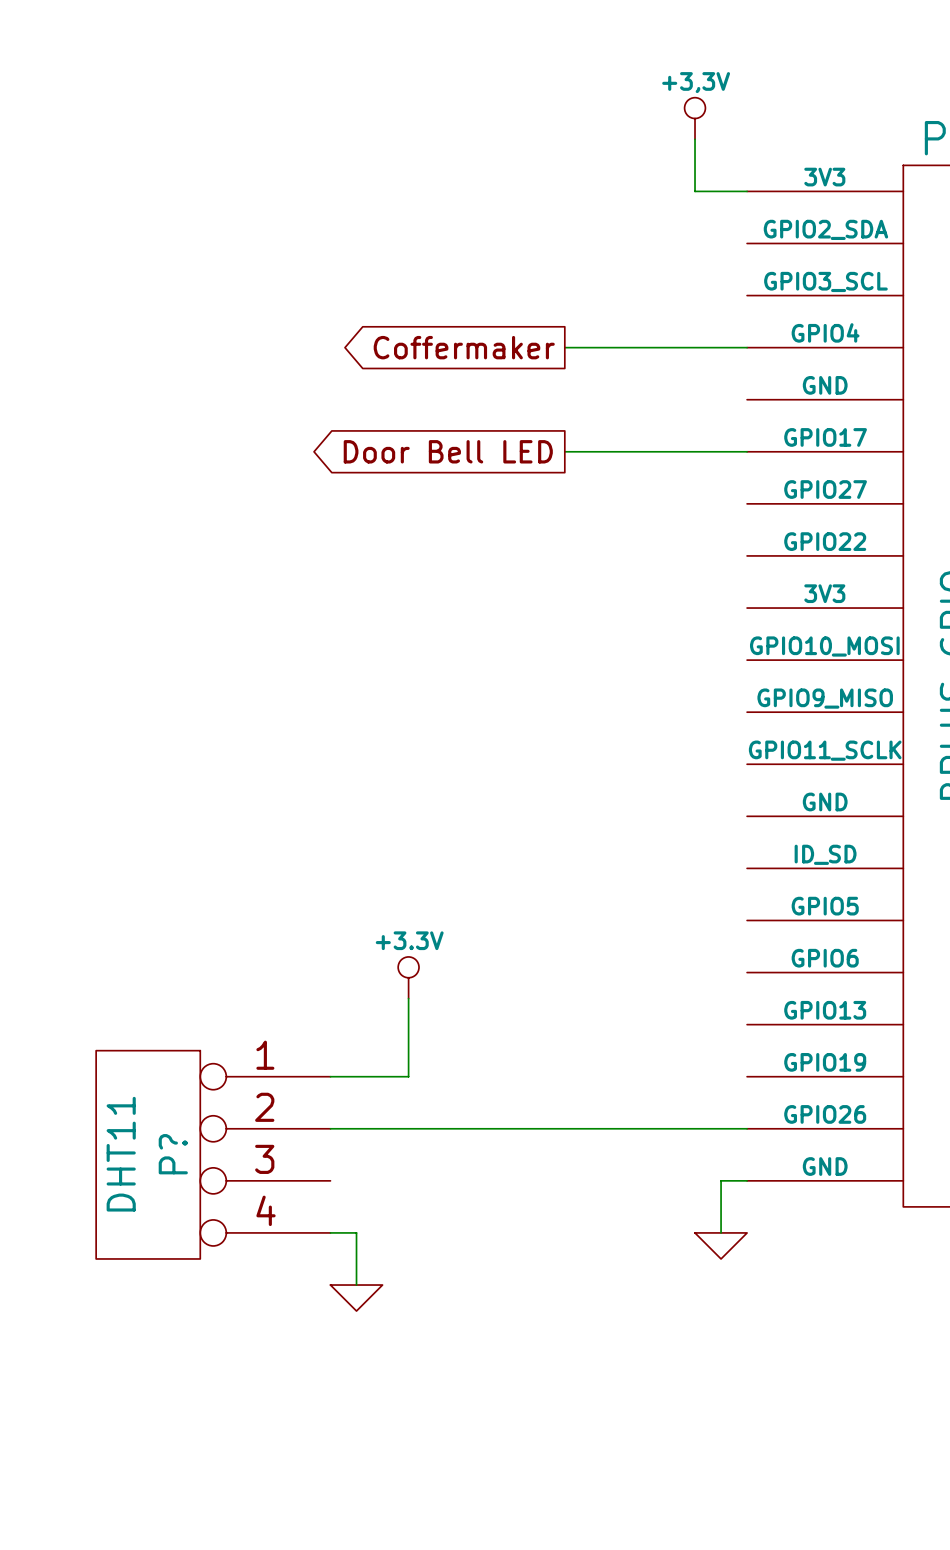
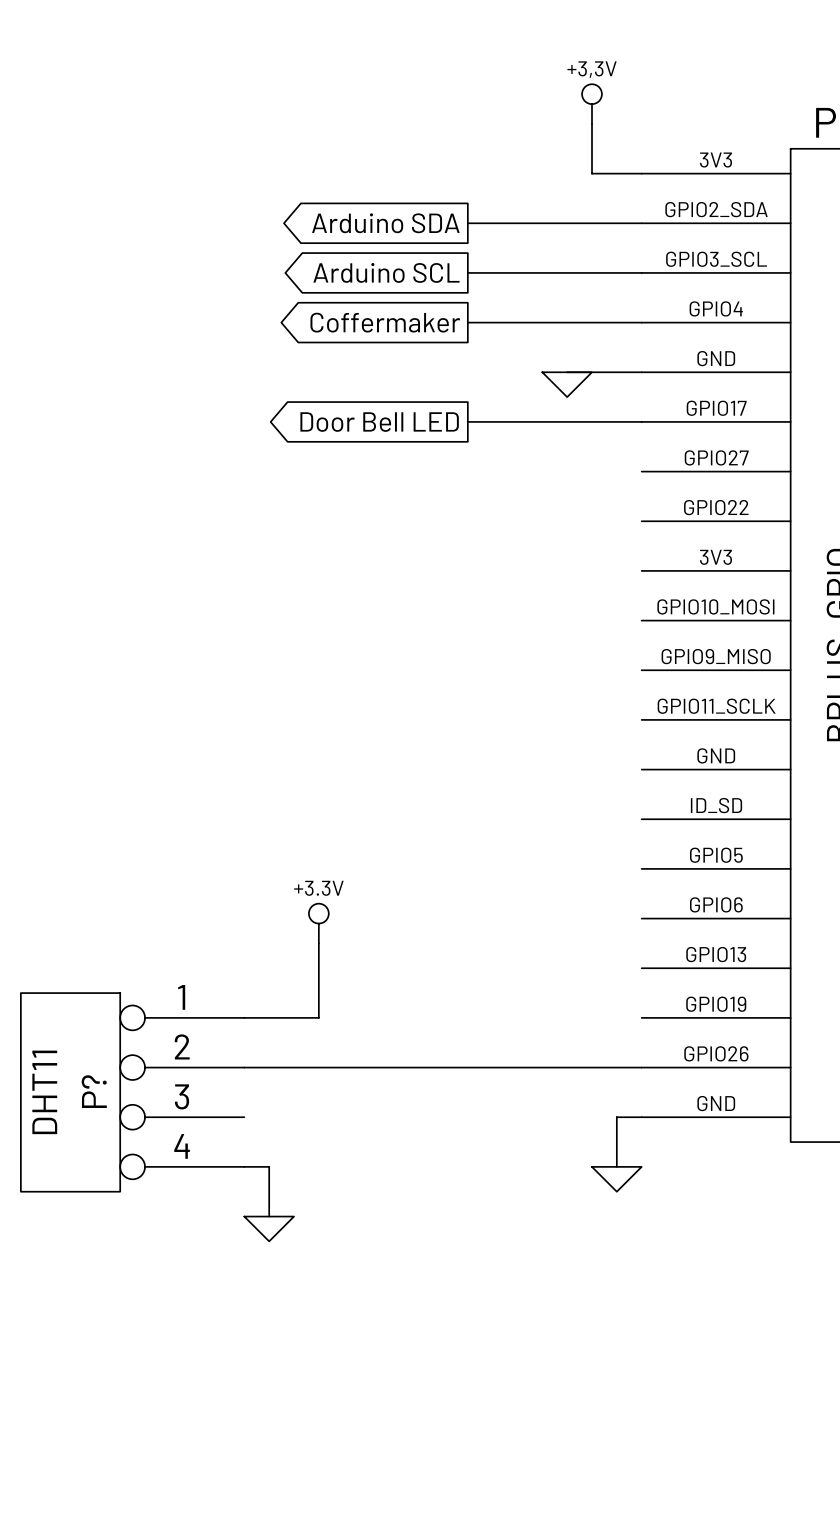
global label: none -> Arduino SDA (385, 223)
wire: none -> (467, 223) (641, 223)
global label: none -> Arduino SCL (386, 272)
wire: none -> (467, 272) (641, 272)
wire: none -> (567, 372) (641, 372)
power symbol: none -> (567, 384)

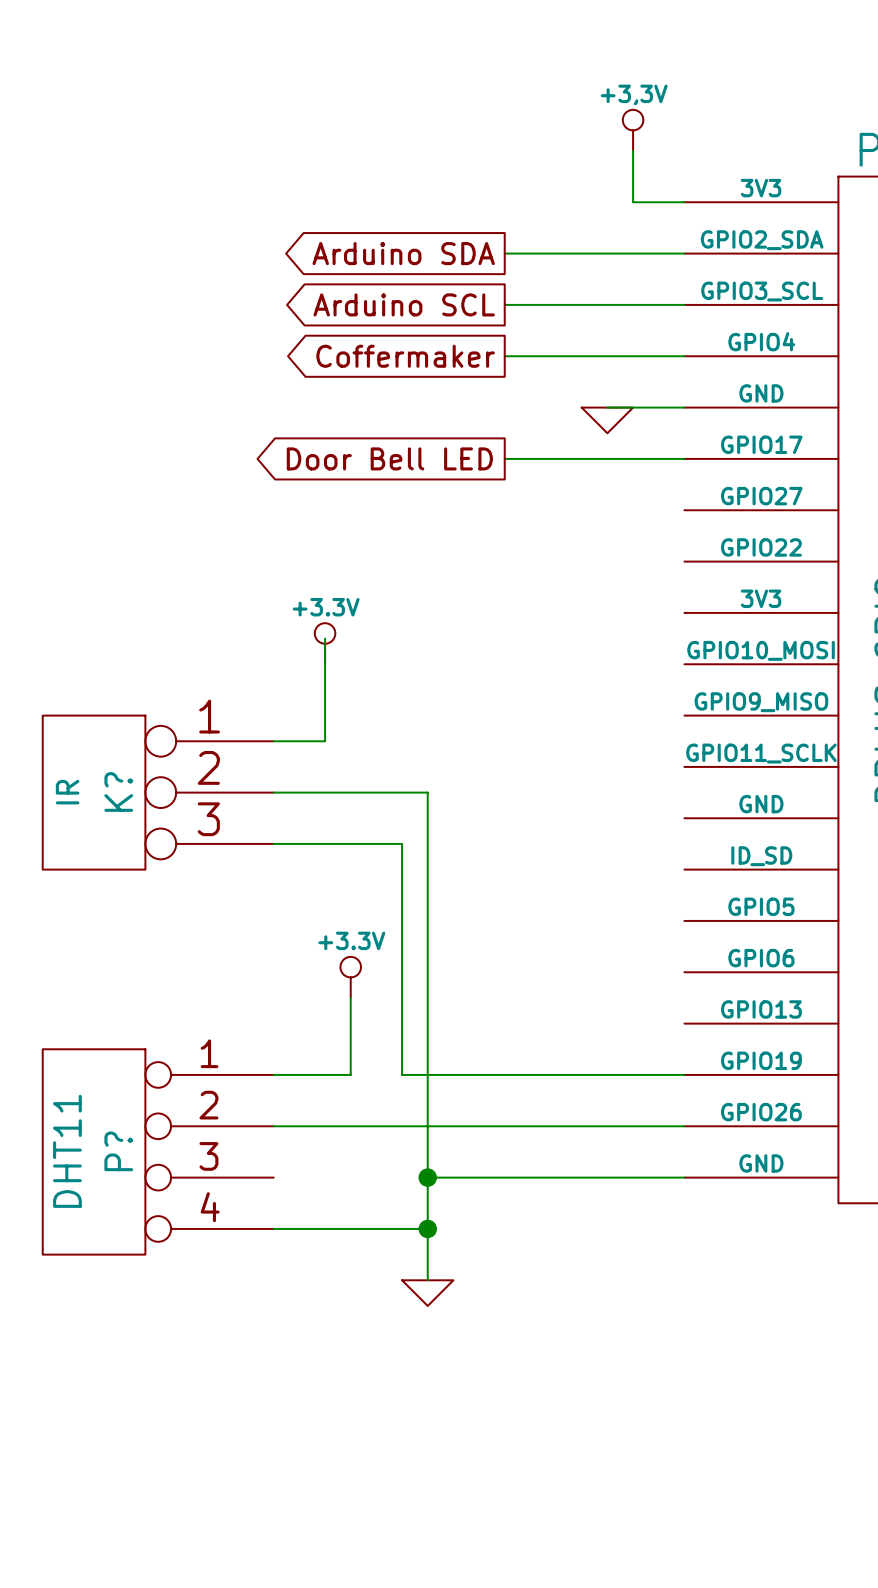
wire: none -> (325, 638) (325, 741) (273, 741)
power symbol: none -> +3.3V (325, 643)
K?: none -> IR (158, 792)
wire: none -> (273, 792) (427, 792) (427, 1280)
wire: none -> (273, 843) (402, 843) (402, 1074) (684, 1074)
junction: none -> (427, 1177)
wire: (616, 1117) (616, 1166) -> (658, 1177) (427, 1177)
wire: (269, 1166) (269, 1216) -> (299, 1228) (427, 1228)
junction: none -> (427, 1228)
power symbol: (616, 1179) -> none
power symbol: (269, 1228) -> none
power symbol: none -> (427, 1293)

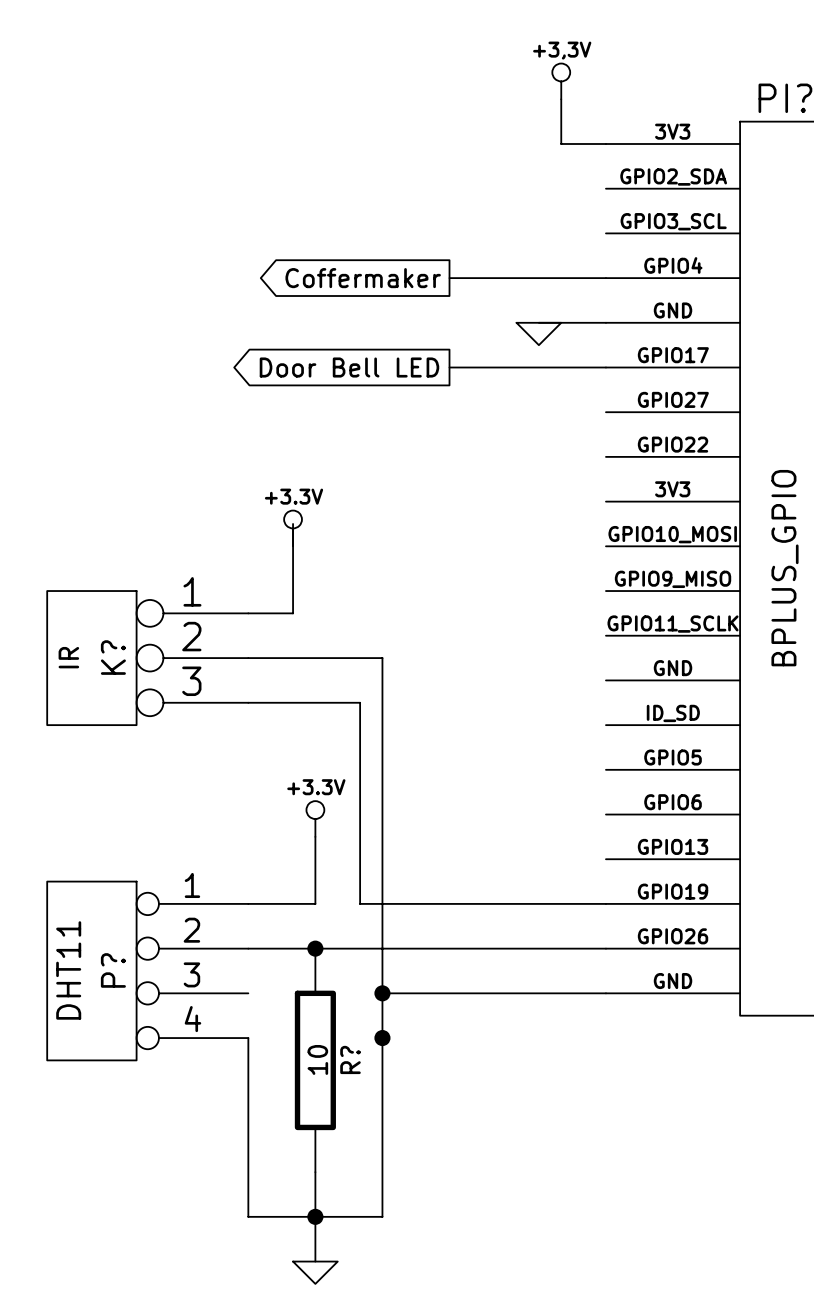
global label: Arduino SDA (403, 253) -> none
wire: (504, 253) (684, 253) -> none
global label: Arduino SCL (404, 304) -> none
wire: (504, 304) (684, 304) -> none
junction: none -> (315, 948)
wire: (273, 1228) (427, 1228) -> (248, 1038) (248, 1216) (382, 1216) (382, 1082)
R?: none -> 10 (315, 1060)
power symbol position: (427, 1293) -> (315, 1272)
wire: none -> (315, 1172) (315, 1261)
junction: none -> (315, 1216)

